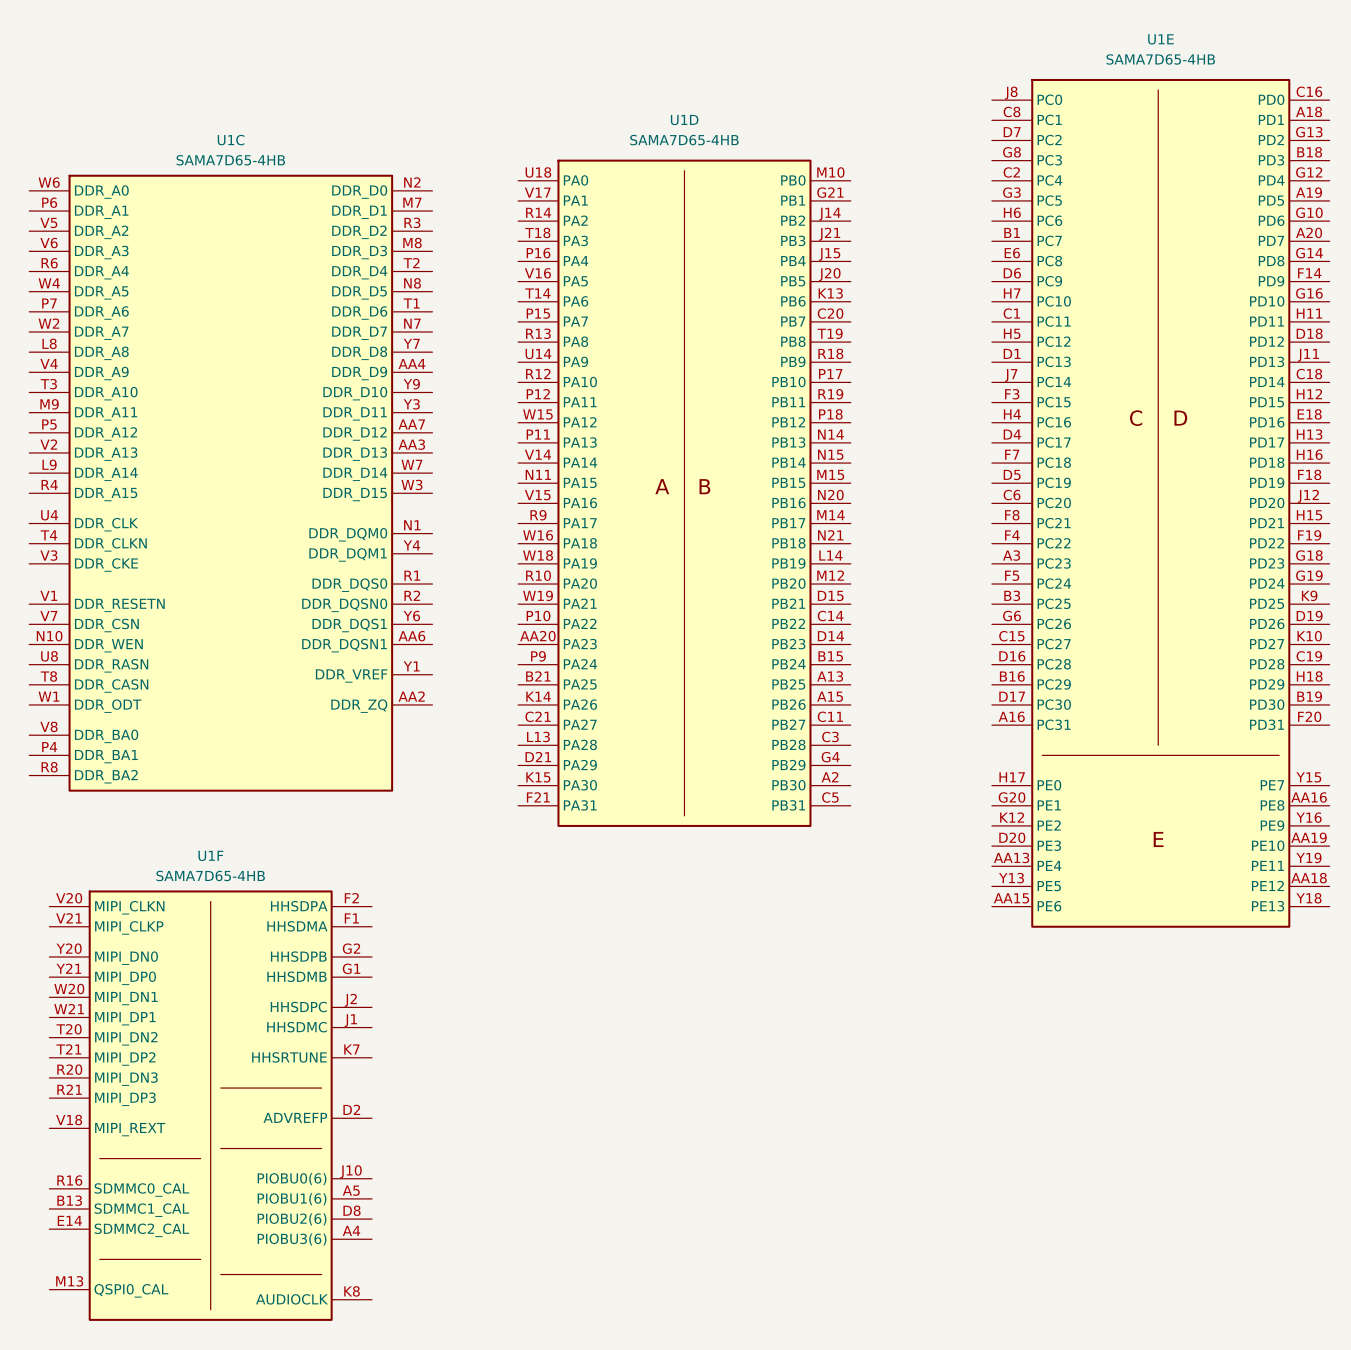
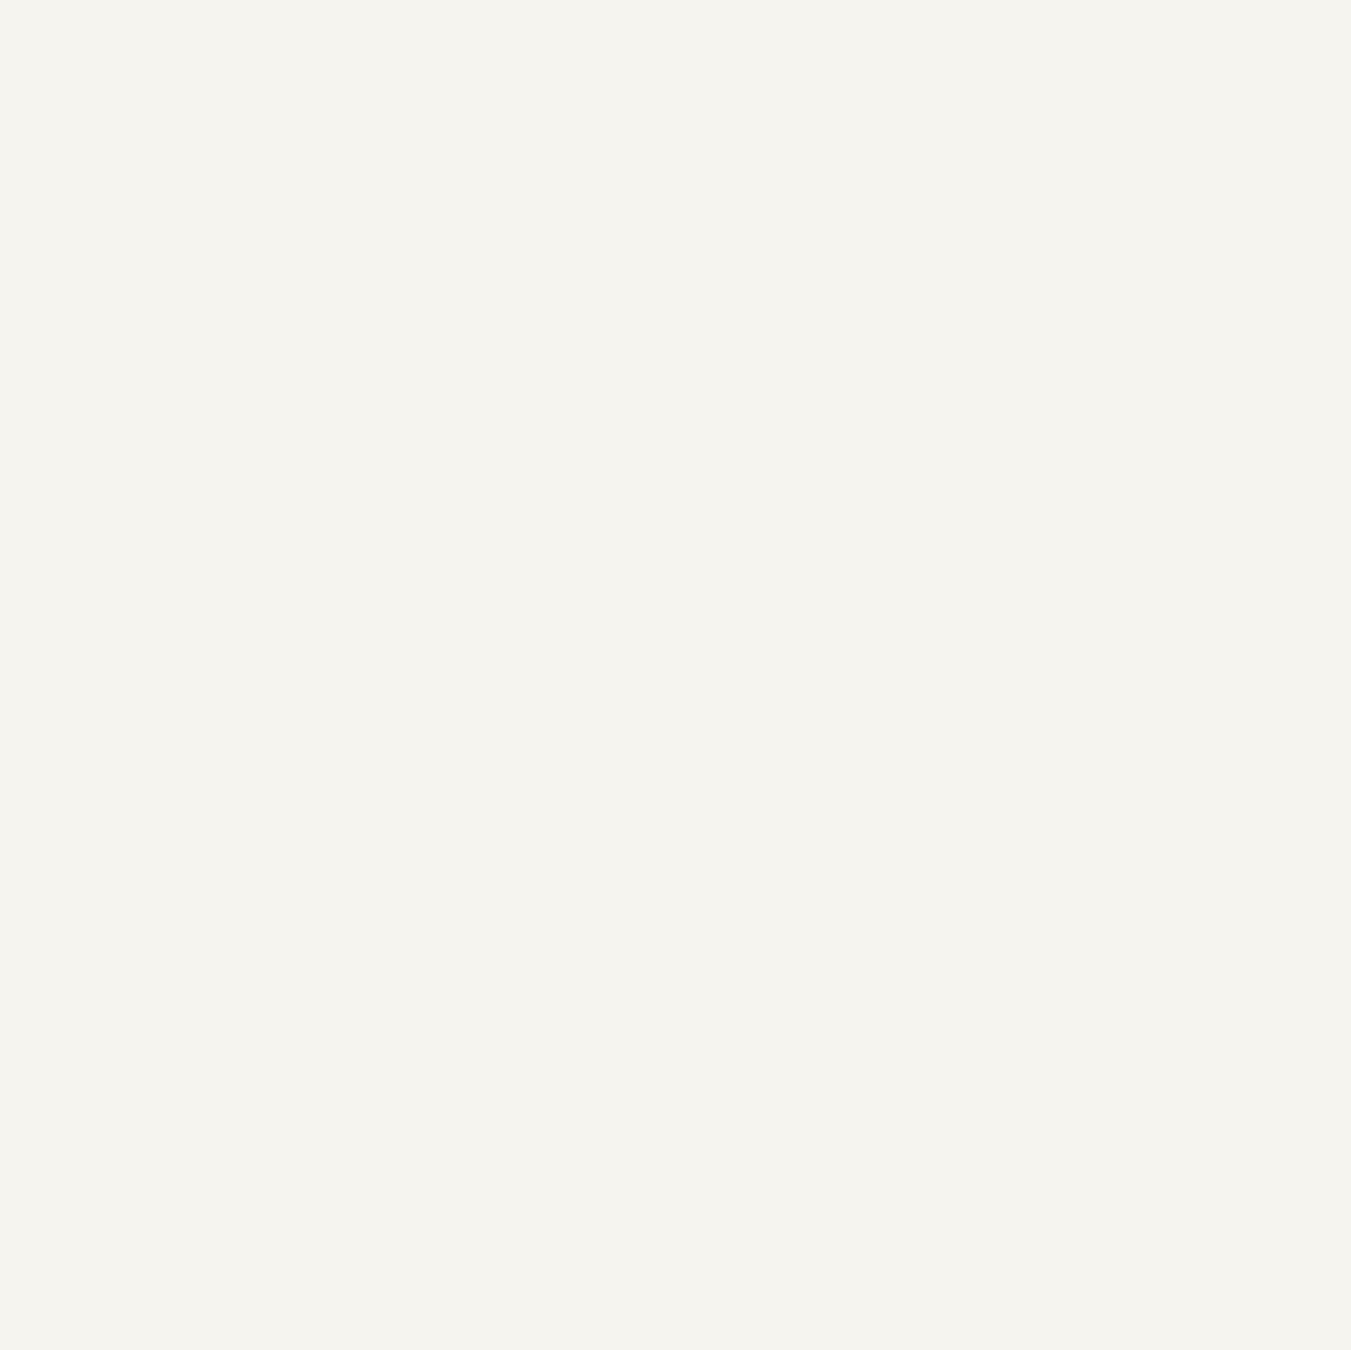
U1C: SAMA7D65-4HB (230, 483) -> none
U1D: SAMA7D65-4HB (684, 493) -> none
U1E: SAMA7D65-4HB (1160, 503) -> none
U1F: SAMA7D65-4HB (210, 1105) -> none

